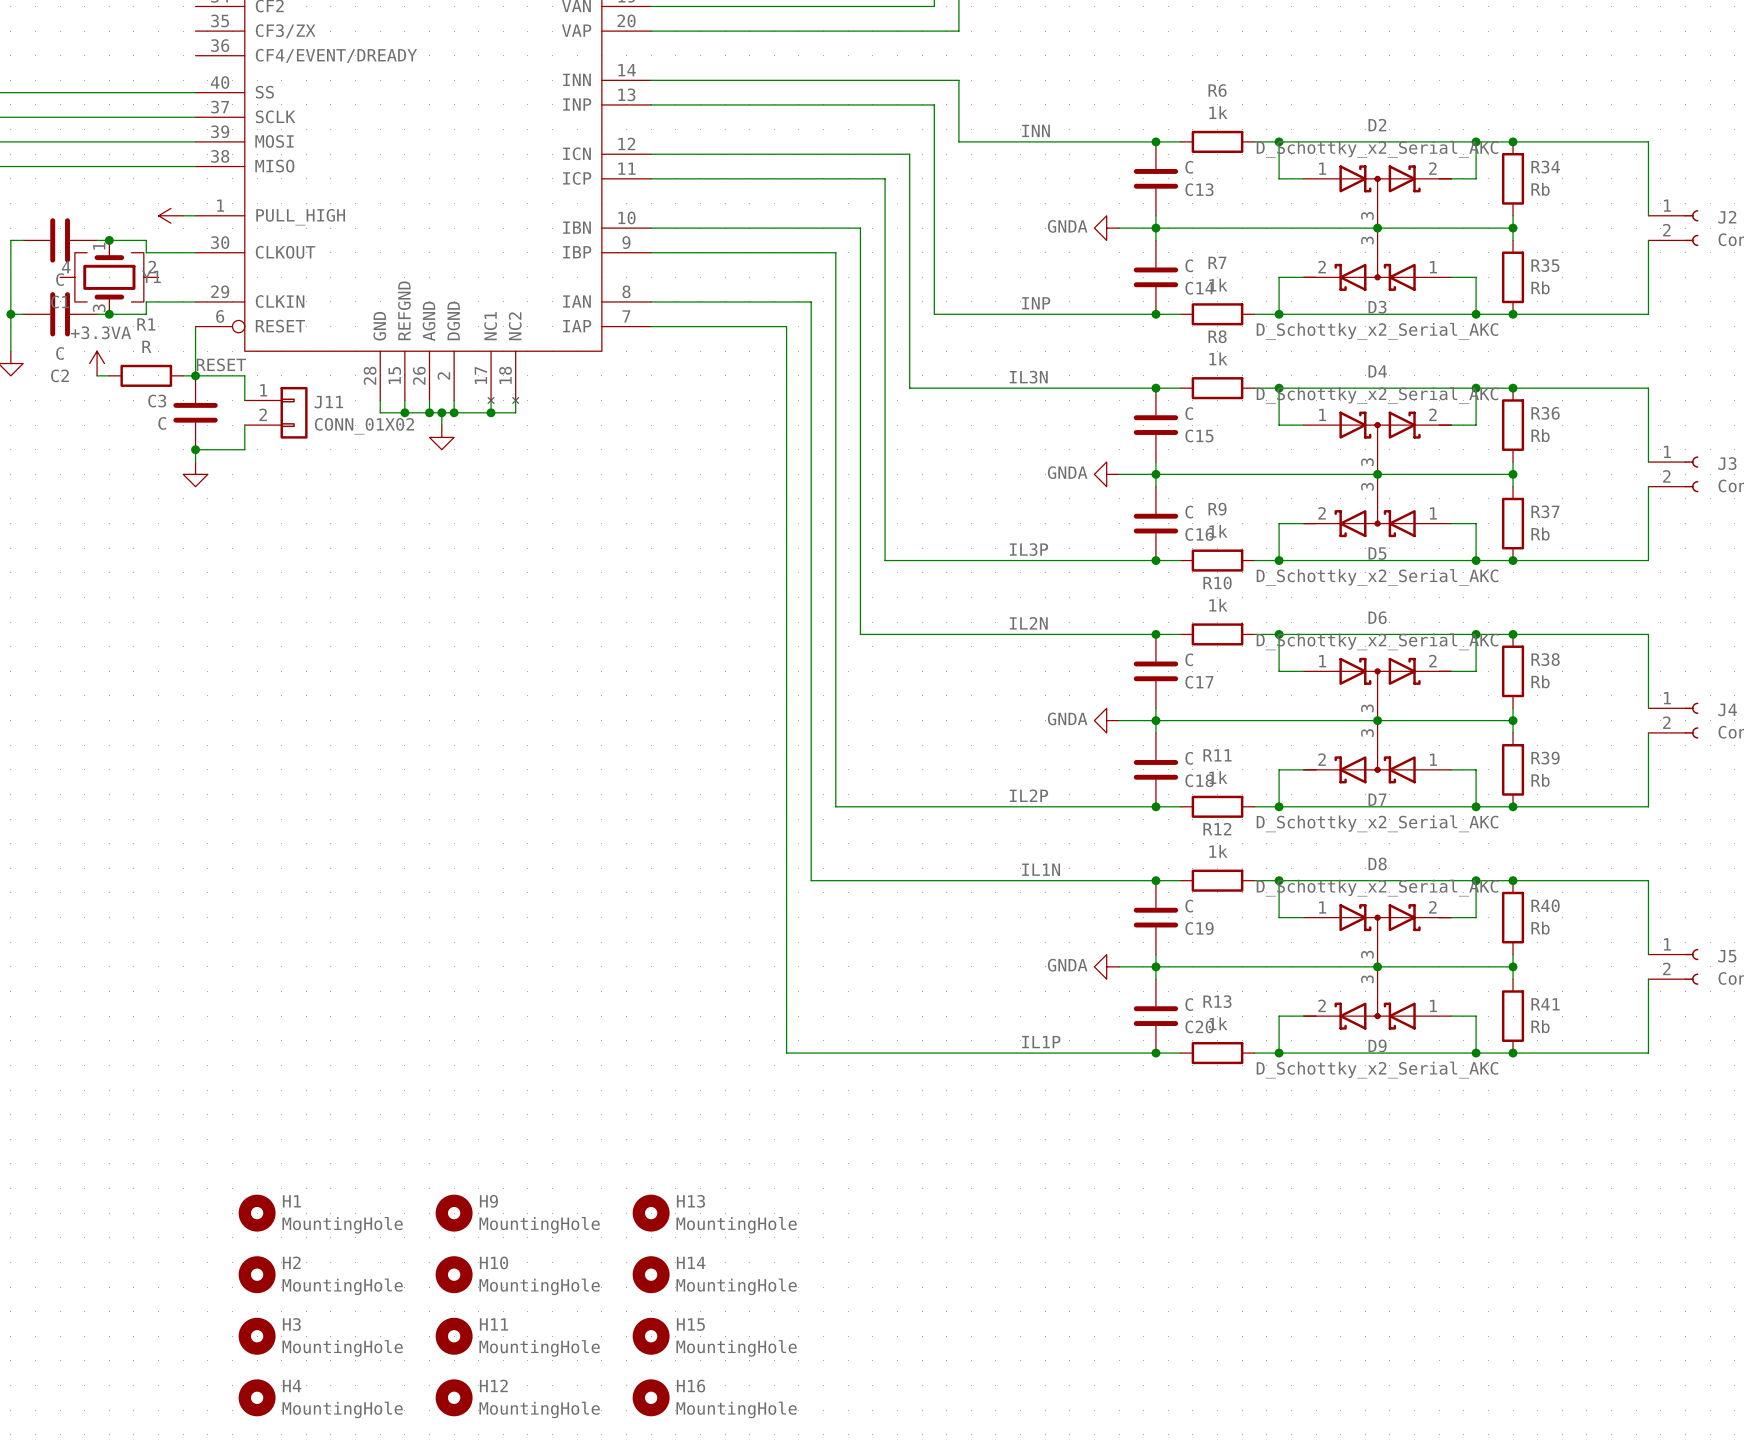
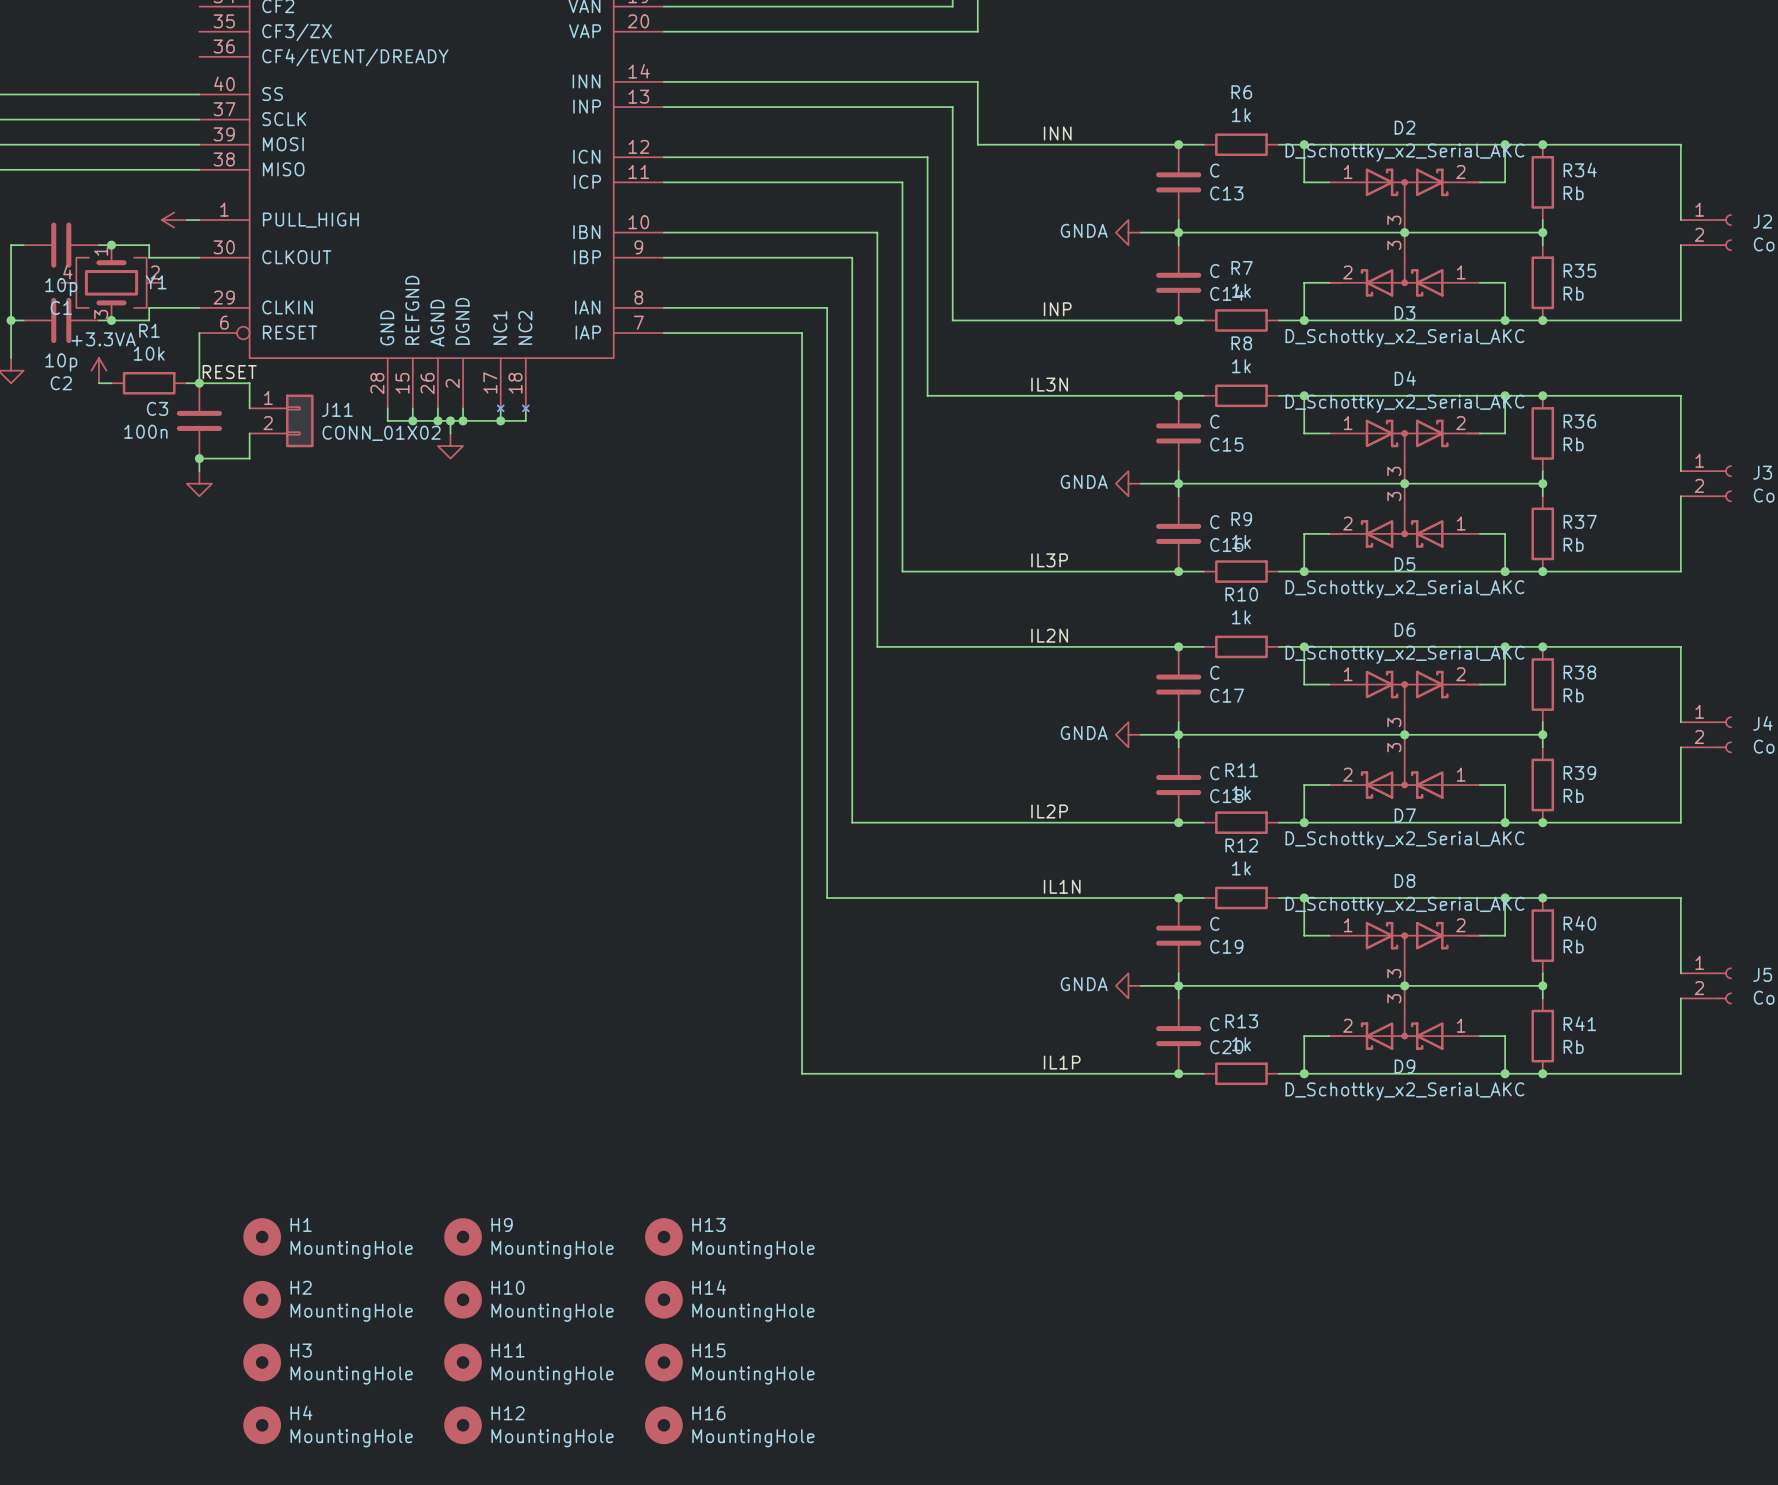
C1 value: C (60, 279) -> 10p (61, 287)
R1 value: R (146, 346) -> 10k (149, 353)
C2 value: C (60, 353) -> 10p (61, 362)
C3 value: C (162, 423) -> 100n (145, 431)

